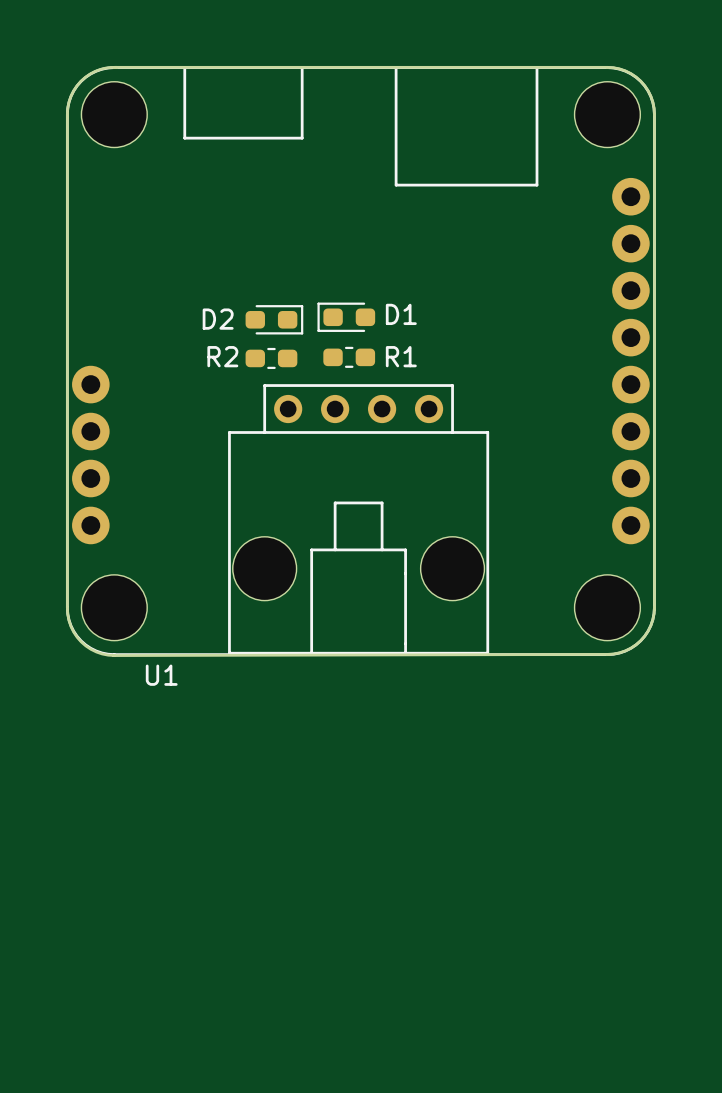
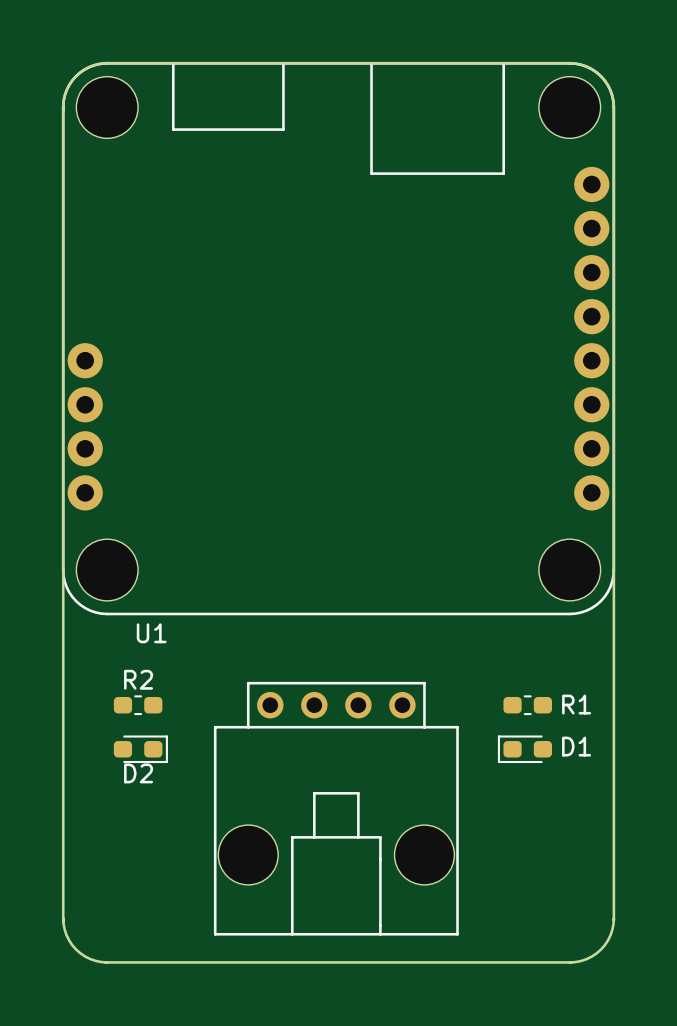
D1 position: (346, 317) -> (524, 749)
D2 name position: D2 (218, 319) -> D2 (138, 773)
D2 position: (274, 319) -> (140, 749)
R2 name position: R2 (222, 356) -> R2 (138, 679)
R1 position: (349, 357) -> (527, 705)
R2 position: (271, 358) -> (138, 705)
part position: (358, 519) -> (336, 808)
board edge: none -> (63, 569) (63, 921)
board edge: (654, 607) (650, 625) (640, 640) (625, 650) (607, 654) -> (613, 918) (610, 935) (600, 949) (586, 959) (569, 962)
board edge: (67, 608) (71, 626) (81, 641) (96, 652) (114, 655) -> (63, 918) (66, 935) (76, 949) (90, 959) (107, 962)
board edge: none -> (613, 571) (613, 920)
board edge: (609, 654) (113, 655) -> none
board edge: none -> (105, 962) (571, 962)

